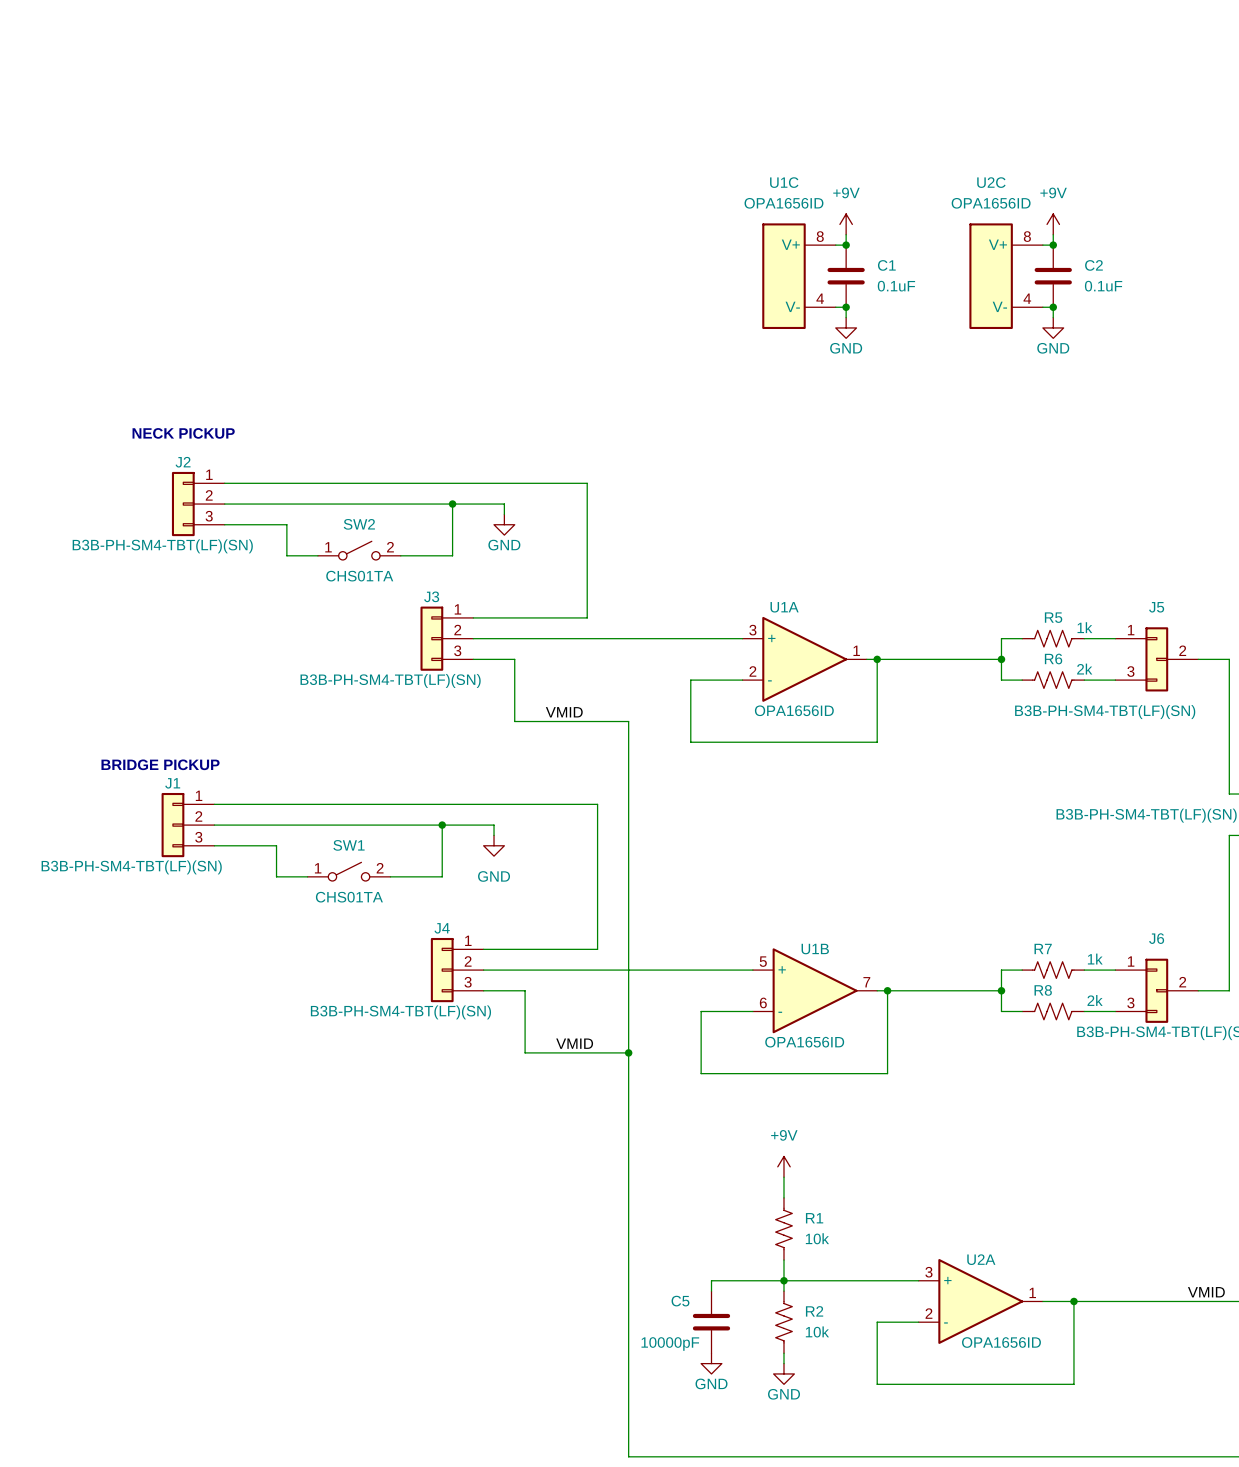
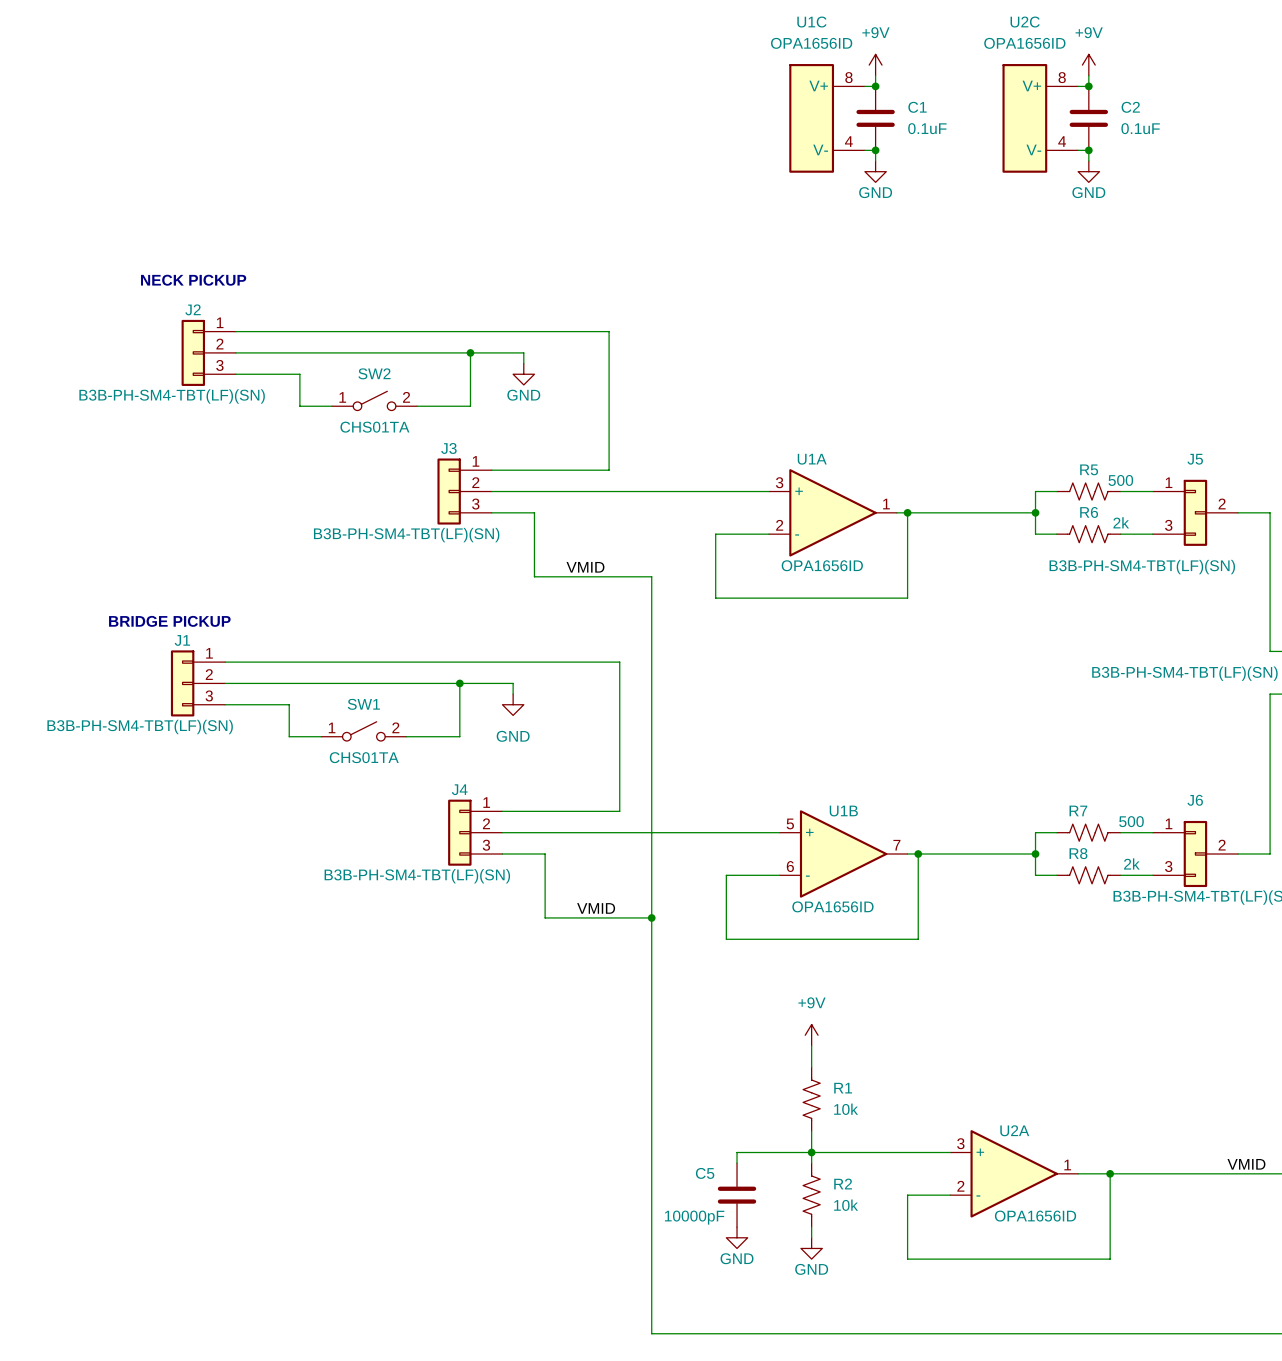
R5 value: 1k (1084, 627) -> 500 (1120, 480)
R7 value: 1k (1095, 959) -> 500 (1131, 821)

